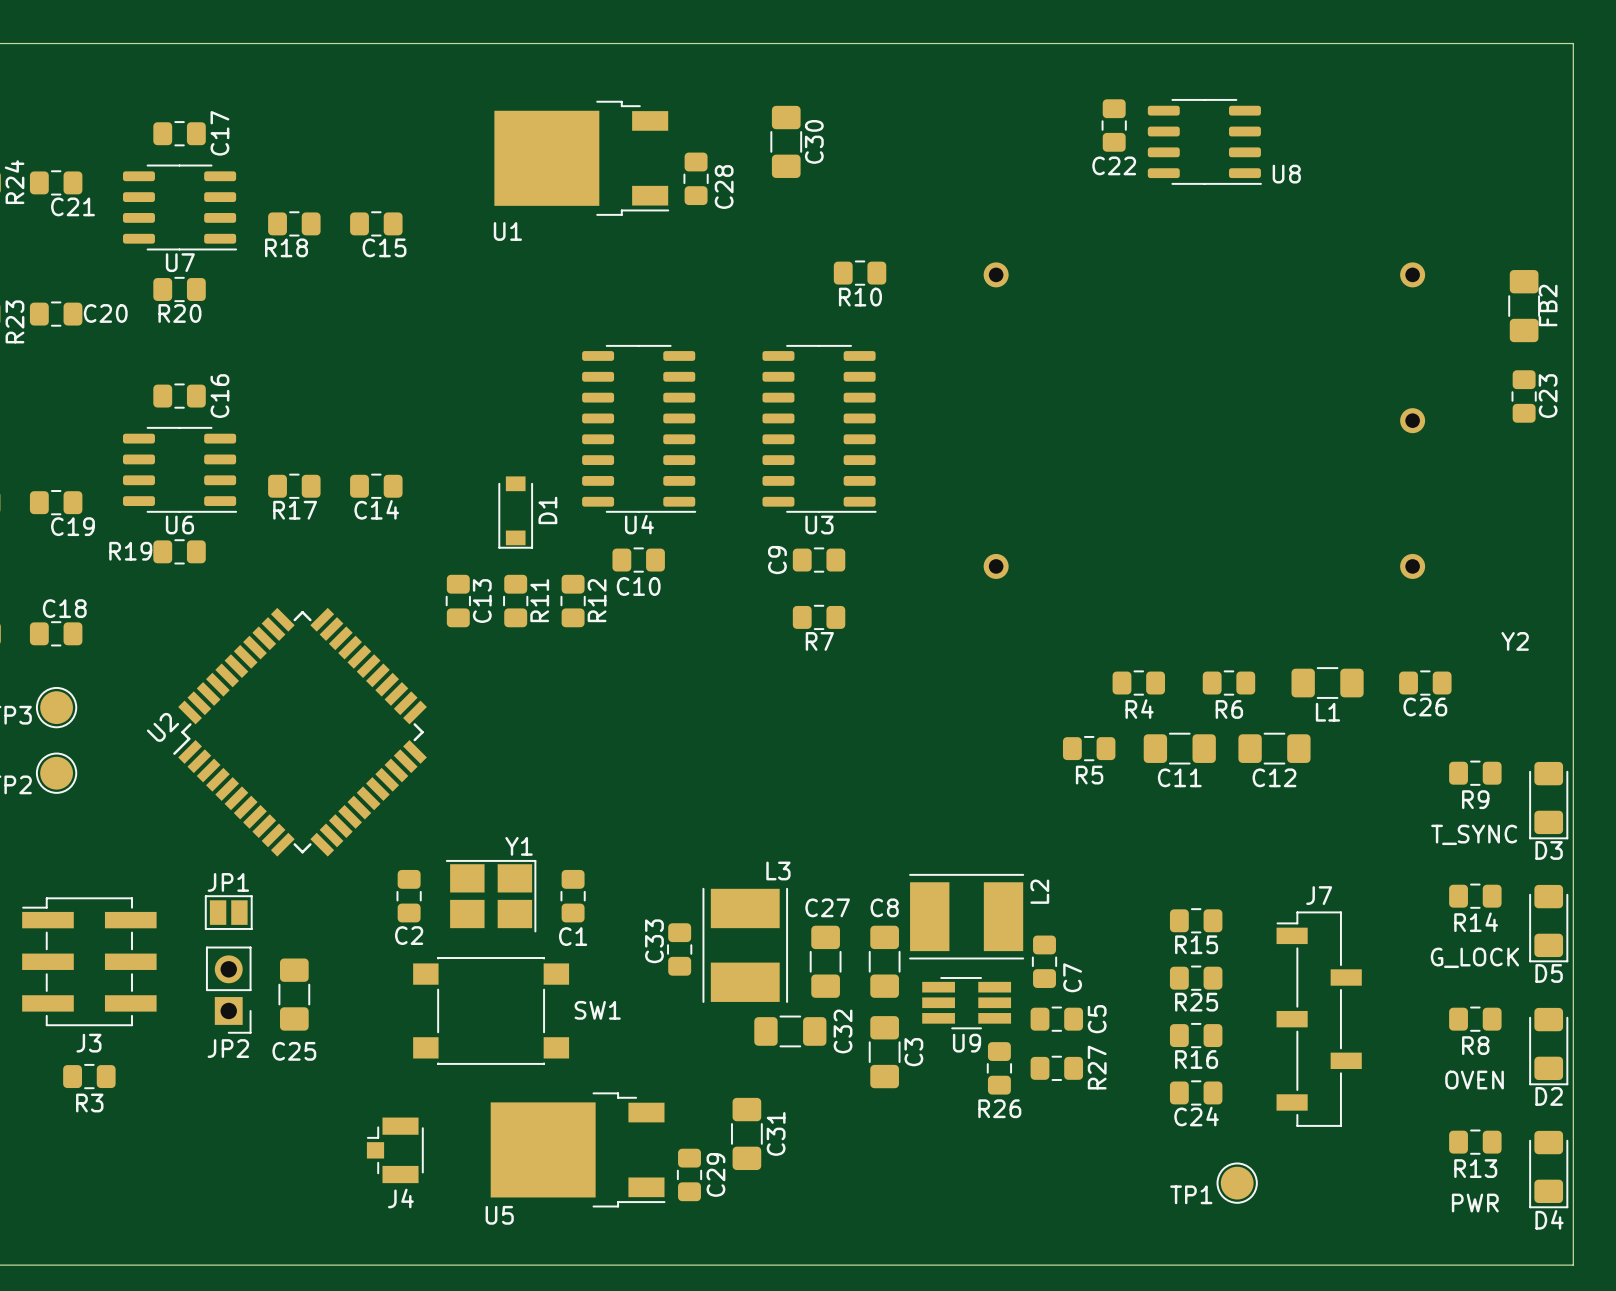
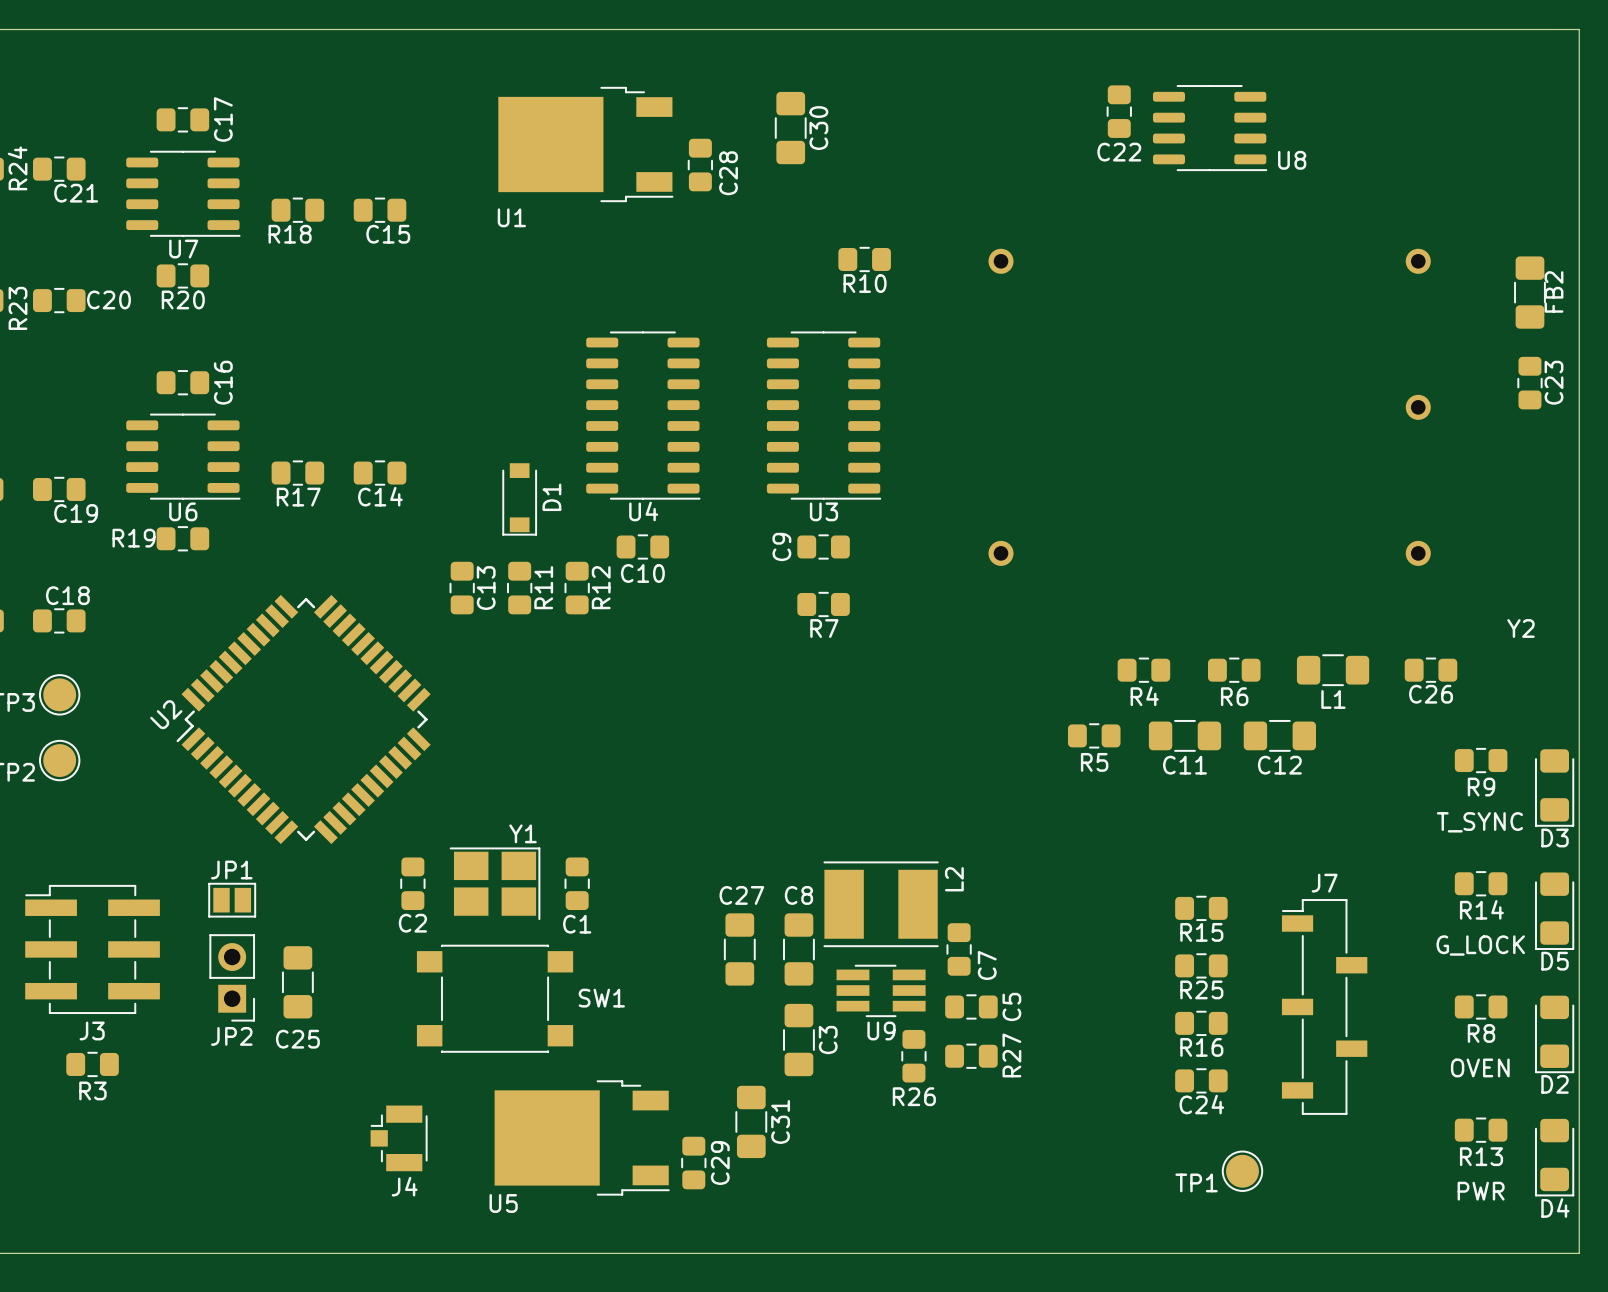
L2 position: (966, 916) -> (881, 904)
L3: (745, 945) -> none
C33: (679, 949) -> none
C27 position: (825, 961) -> (739, 949)
C8 position: (884, 961) -> (798, 949)
C7 position: (1044, 961) -> (959, 949)
U9 position: (966, 1003) -> (881, 990)
C5 position: (1056, 1019) -> (971, 1006)
C32: (790, 1031) -> none
C3 position: (884, 1052) -> (798, 1040)
R26 position: (999, 1068) -> (913, 1056)
R27 position: (1056, 1068) -> (971, 1056)

